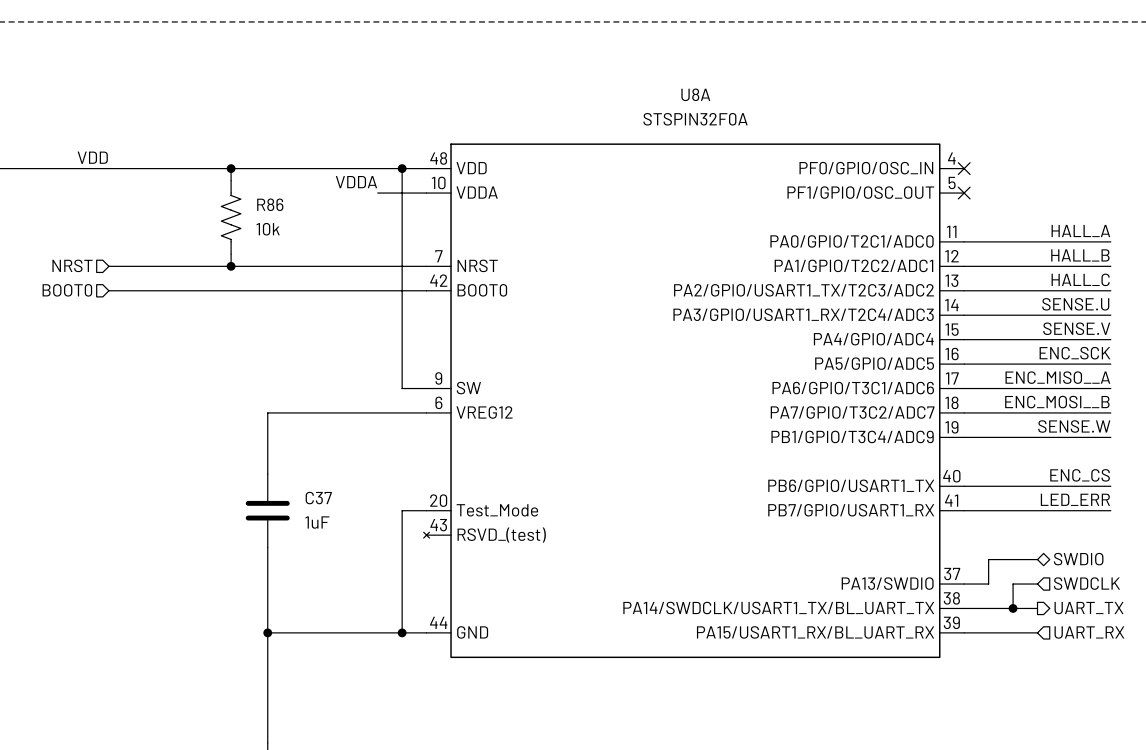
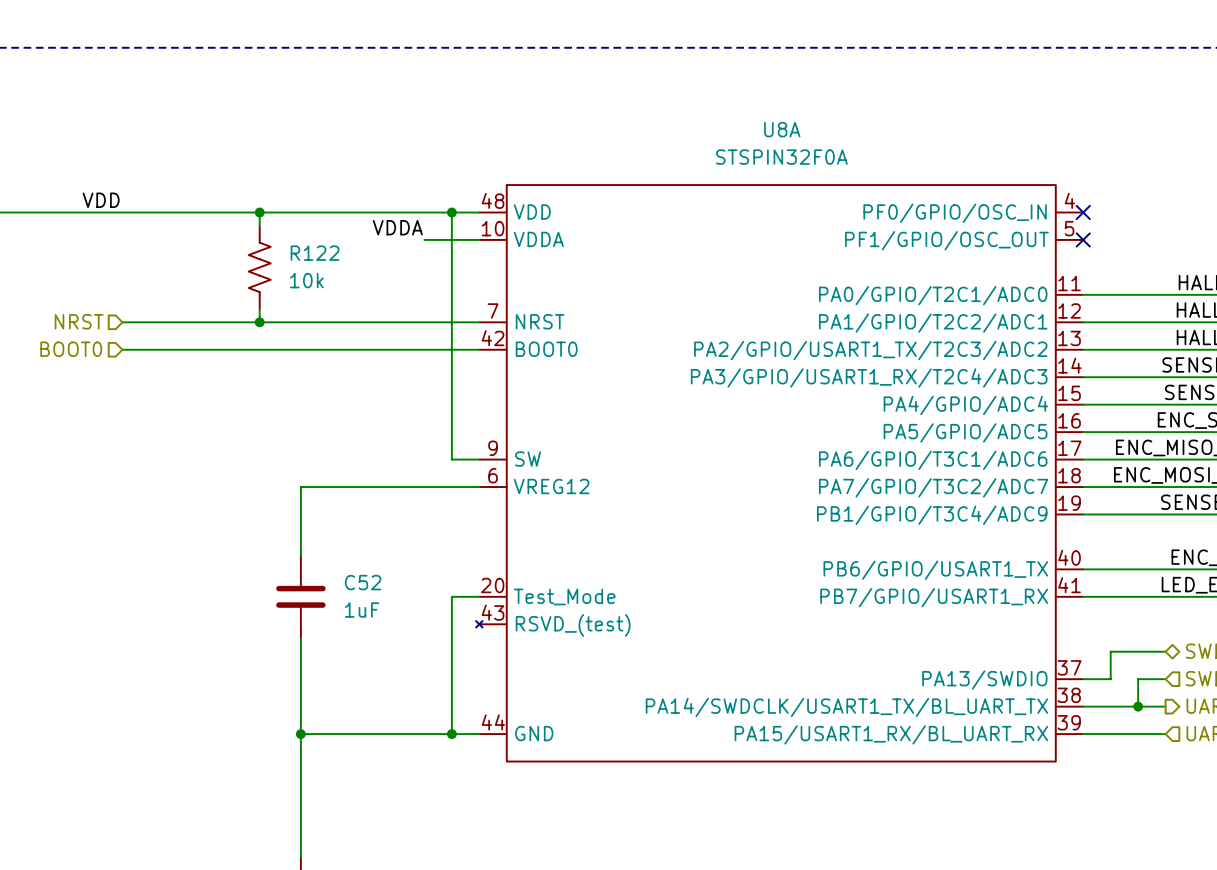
R86 name: R86 (270, 204) -> R122 (315, 253)
C37 name: C37 (318, 498) -> C52 (363, 582)

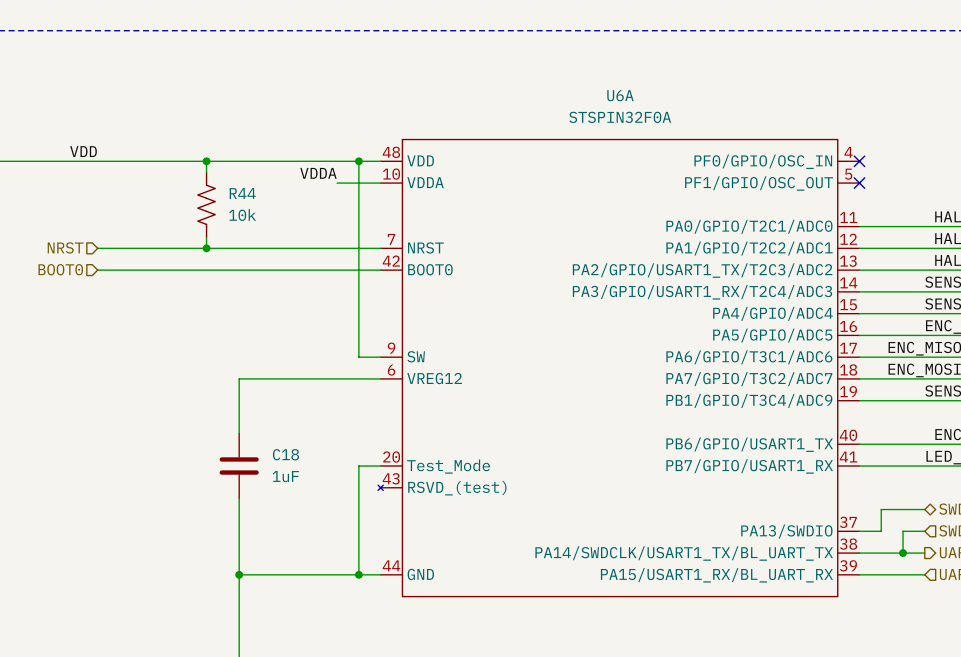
U8A name: U8A (782, 129) -> U6A (620, 95)
R122 name: R122 (315, 253) -> R44 (242, 193)
C52 name: C52 (363, 582) -> C18 (285, 454)

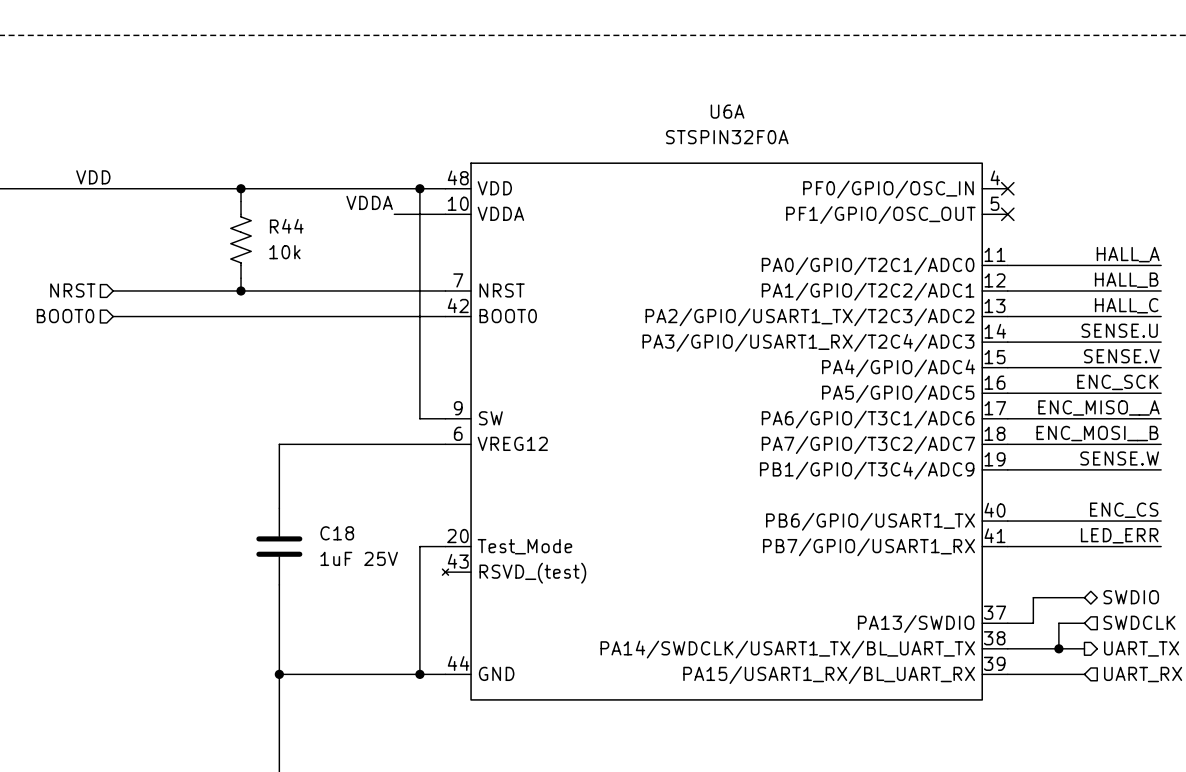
C18 value: 1uF (285, 476) -> 1uF 25V (359, 558)

